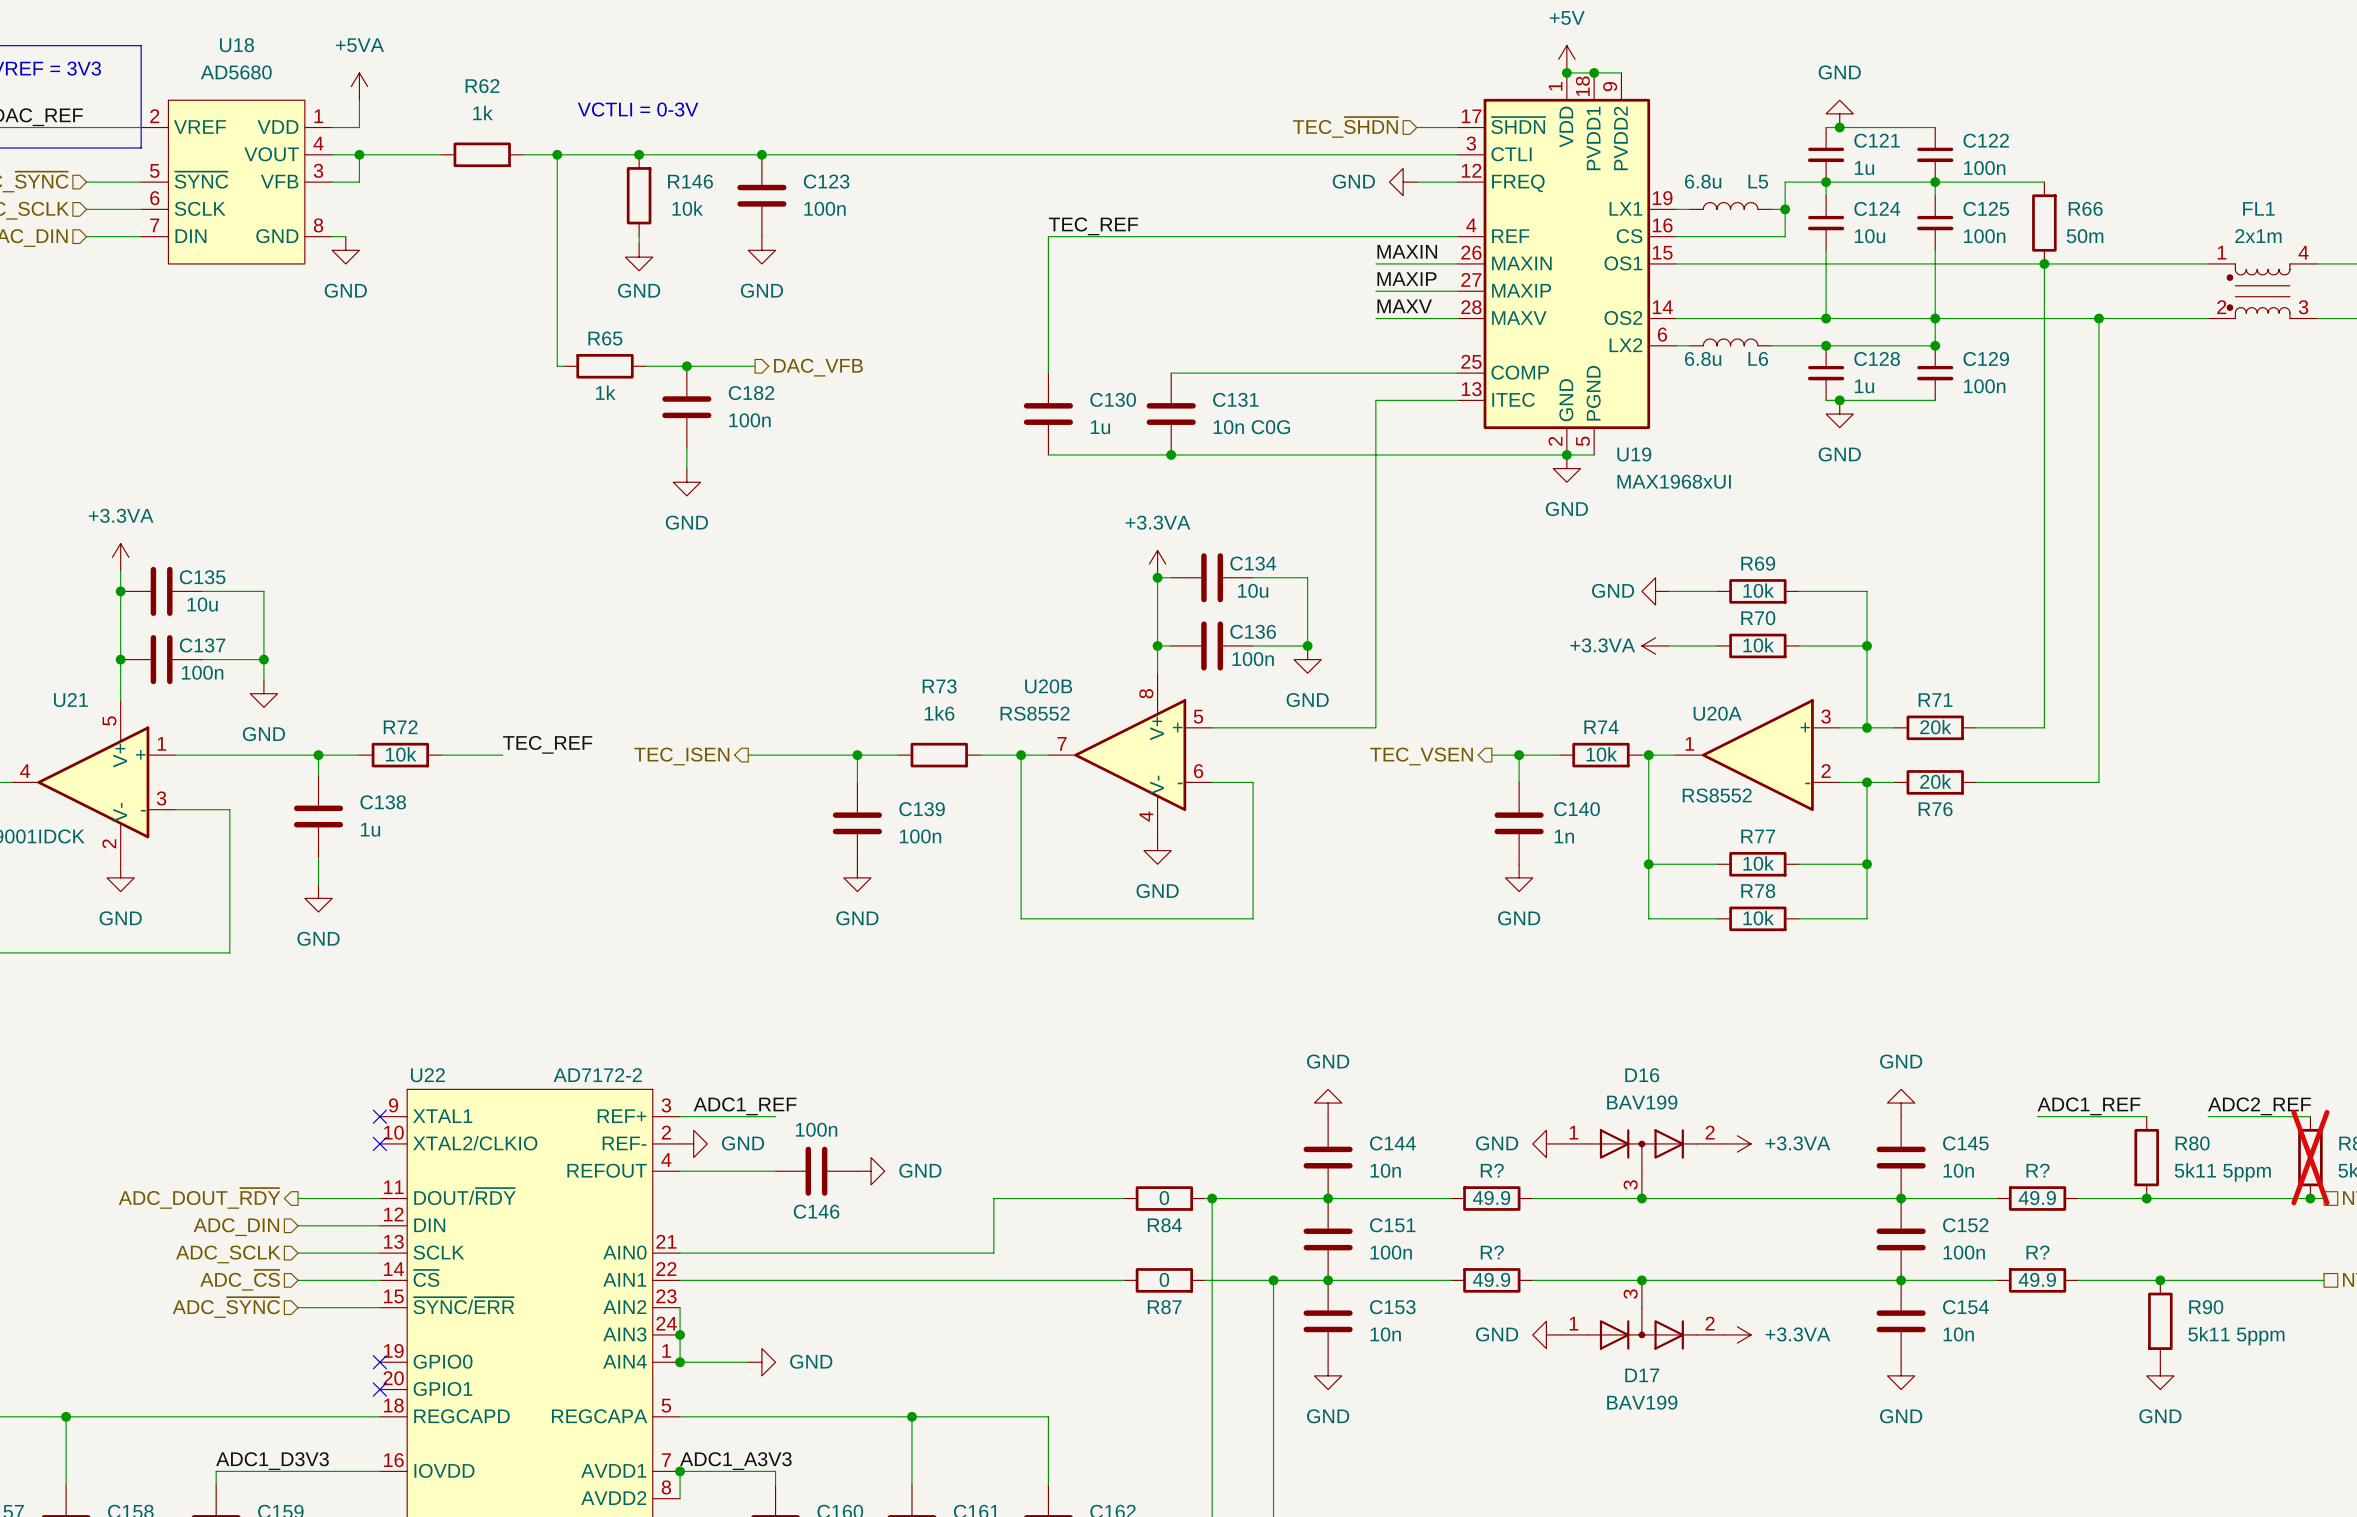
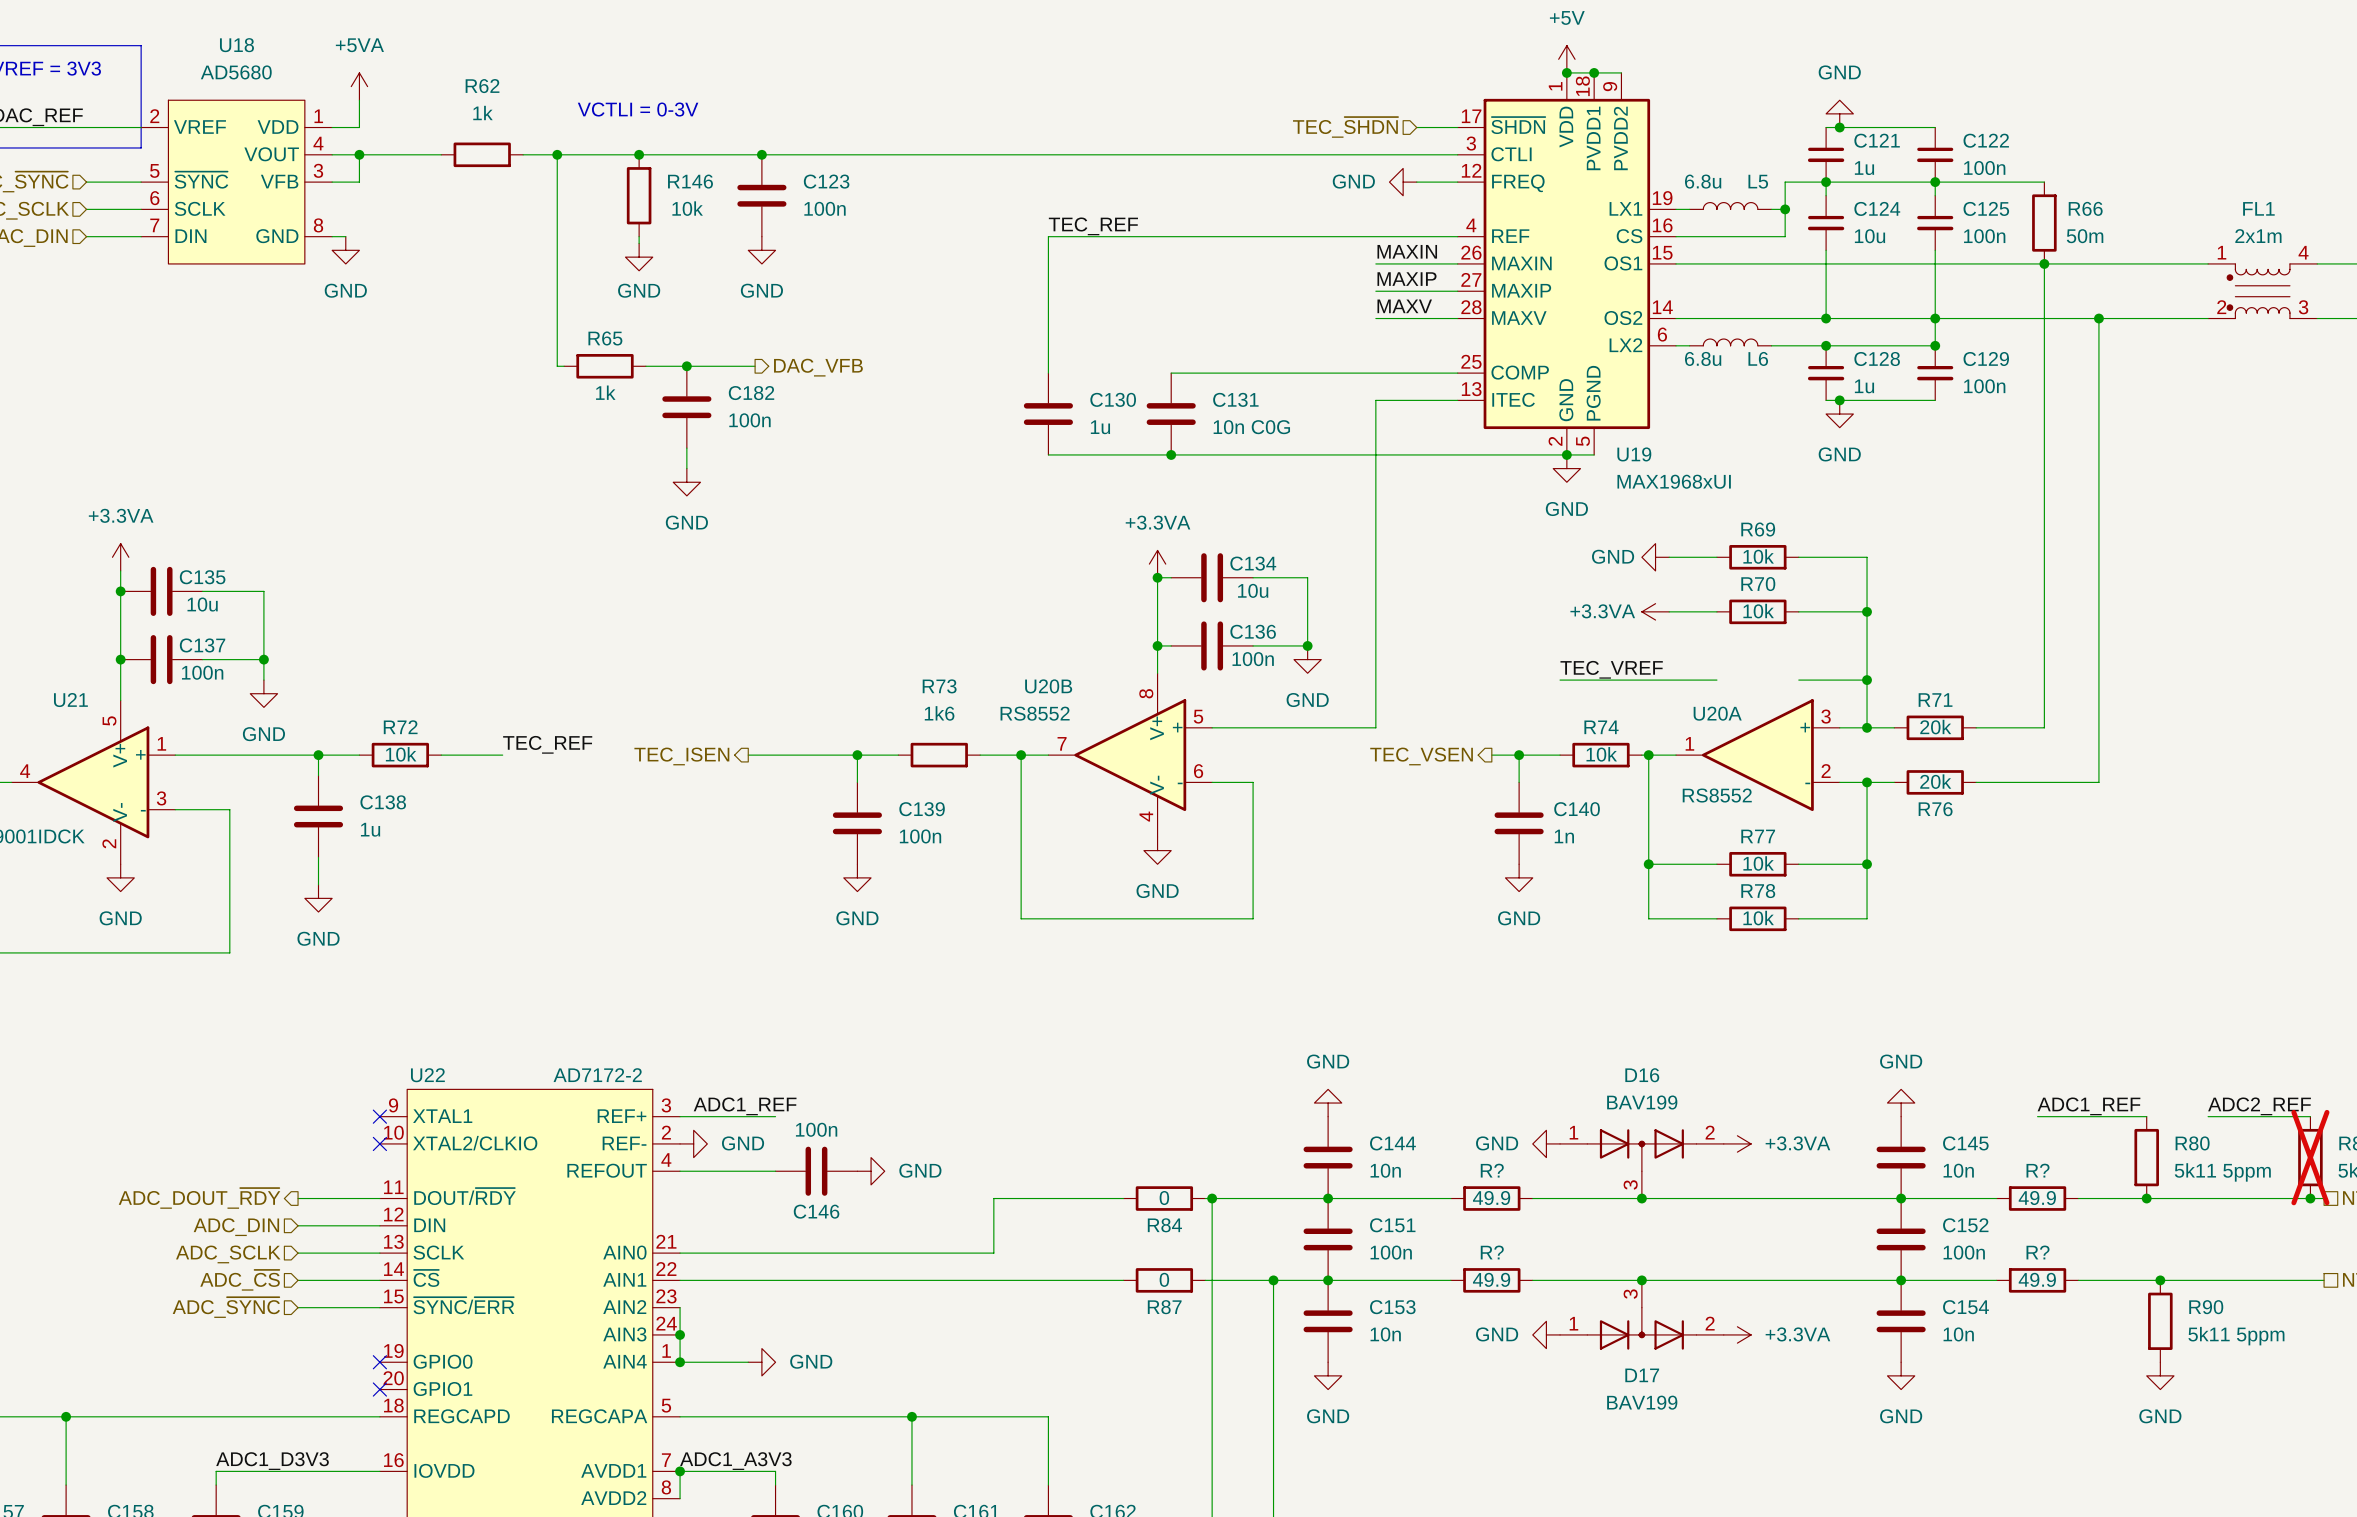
power symbol position: GND (1655, 591) -> GND (1655, 557)
wire: (1669, 591) (1716, 591) -> (1669, 557) (1716, 557)
R69 position: (1757, 591) -> (1757, 557)
wire: (1798, 591) (1867, 591) -> (1798, 557) (1867, 557) (1867, 591)
junction: none -> (1867, 611)
power symbol position: +3.3VA (1655, 645) -> +3.3VA (1655, 611)
wire: (1669, 645) (1716, 645) -> (1669, 611) (1716, 611)
R70 position: (1757, 645) -> (1757, 611)
wire: (1798, 645) (1867, 645) -> (1798, 611) (1867, 611)
junction: (1867, 645) -> none
label: none -> TEC_VREF (1611, 669)
wire: none -> (1560, 680) (1716, 680)
wire: none -> (1798, 680) (1867, 680)
junction: none -> (1867, 680)

